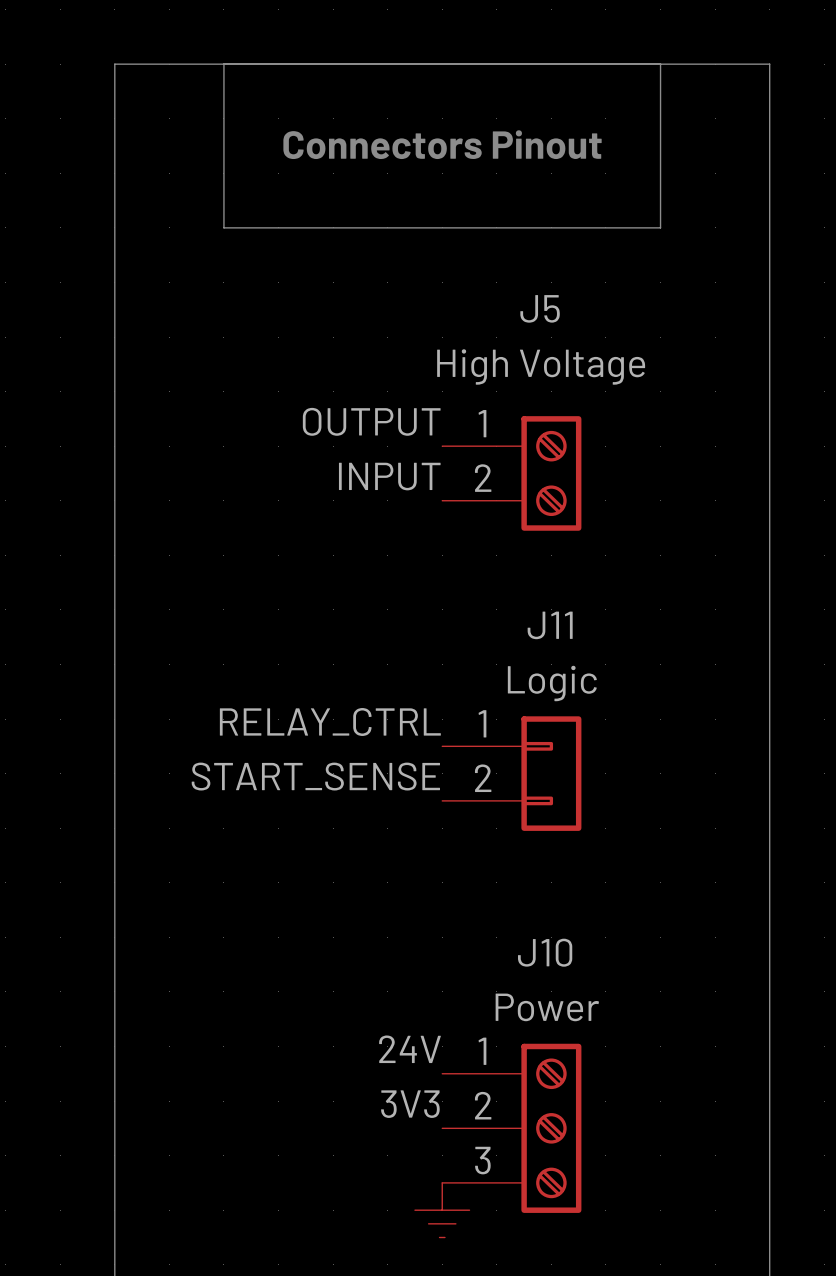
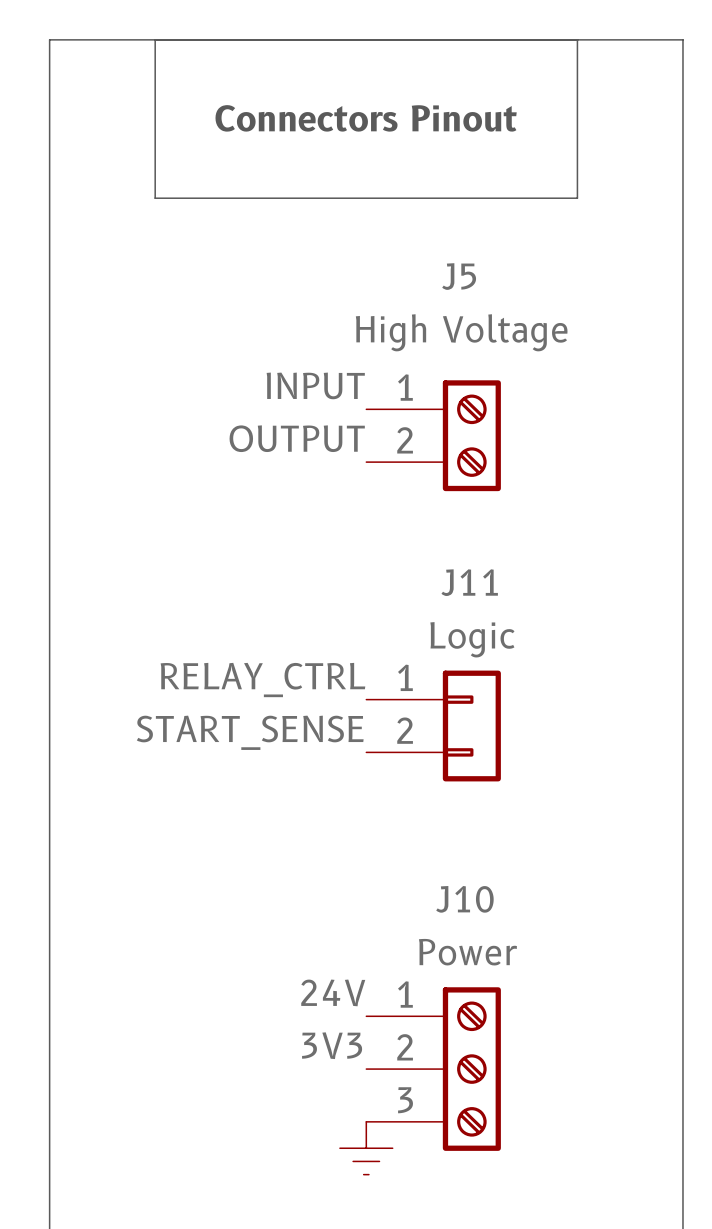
label: OUTPUT (371, 421) -> INPUT (315, 385)
label: INPUT (389, 476) -> OUTPUT (297, 438)

